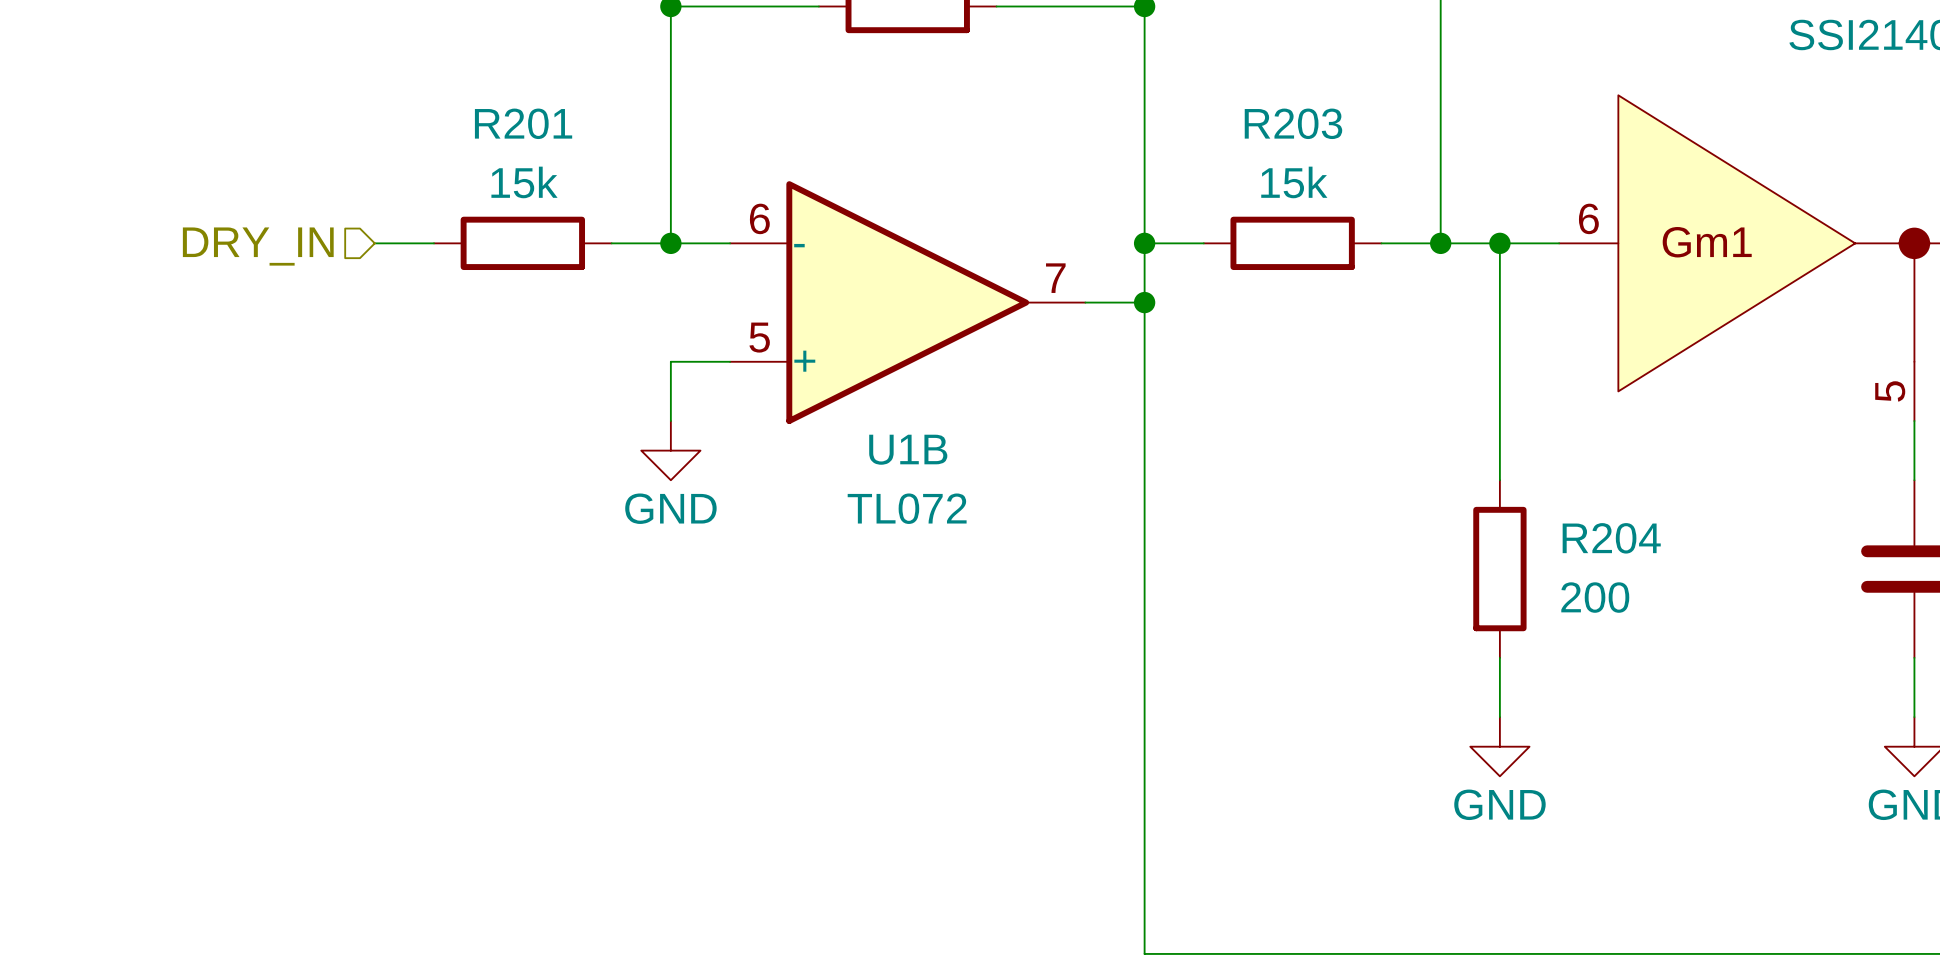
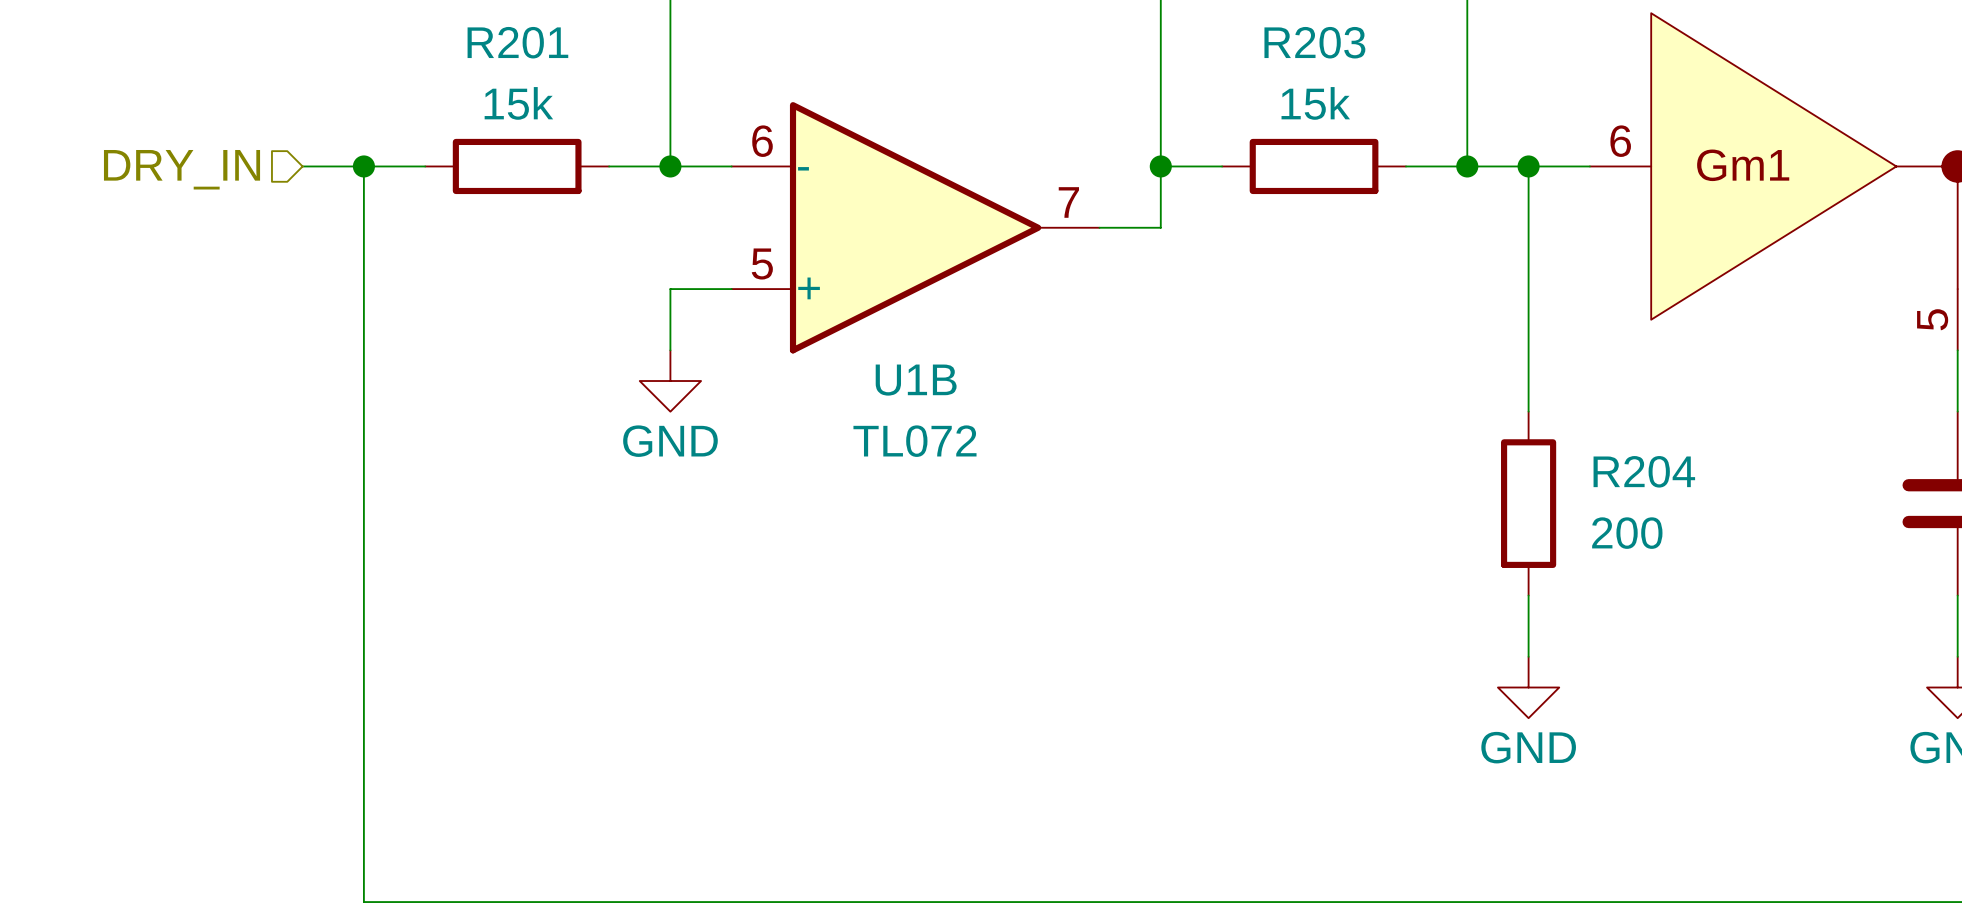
junction: none -> (363, 166)
hierarchical label position: DRY_IN (258, 246) -> DRY_IN (182, 169)
wire: (1144, 302) (1144, 953) -> (302, 166) (363, 166) (363, 902) (1160, 902)
junction: (1144, 302) -> none

